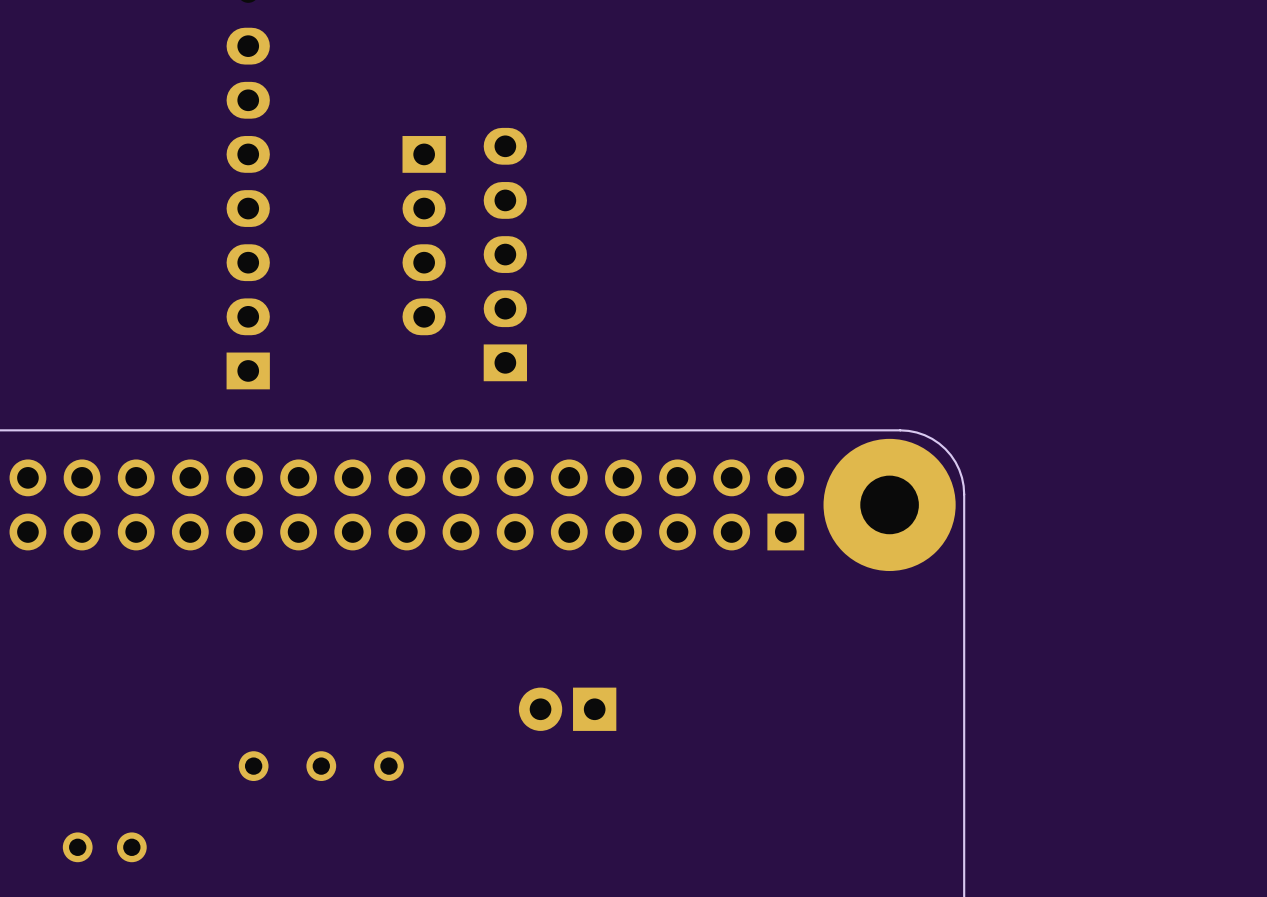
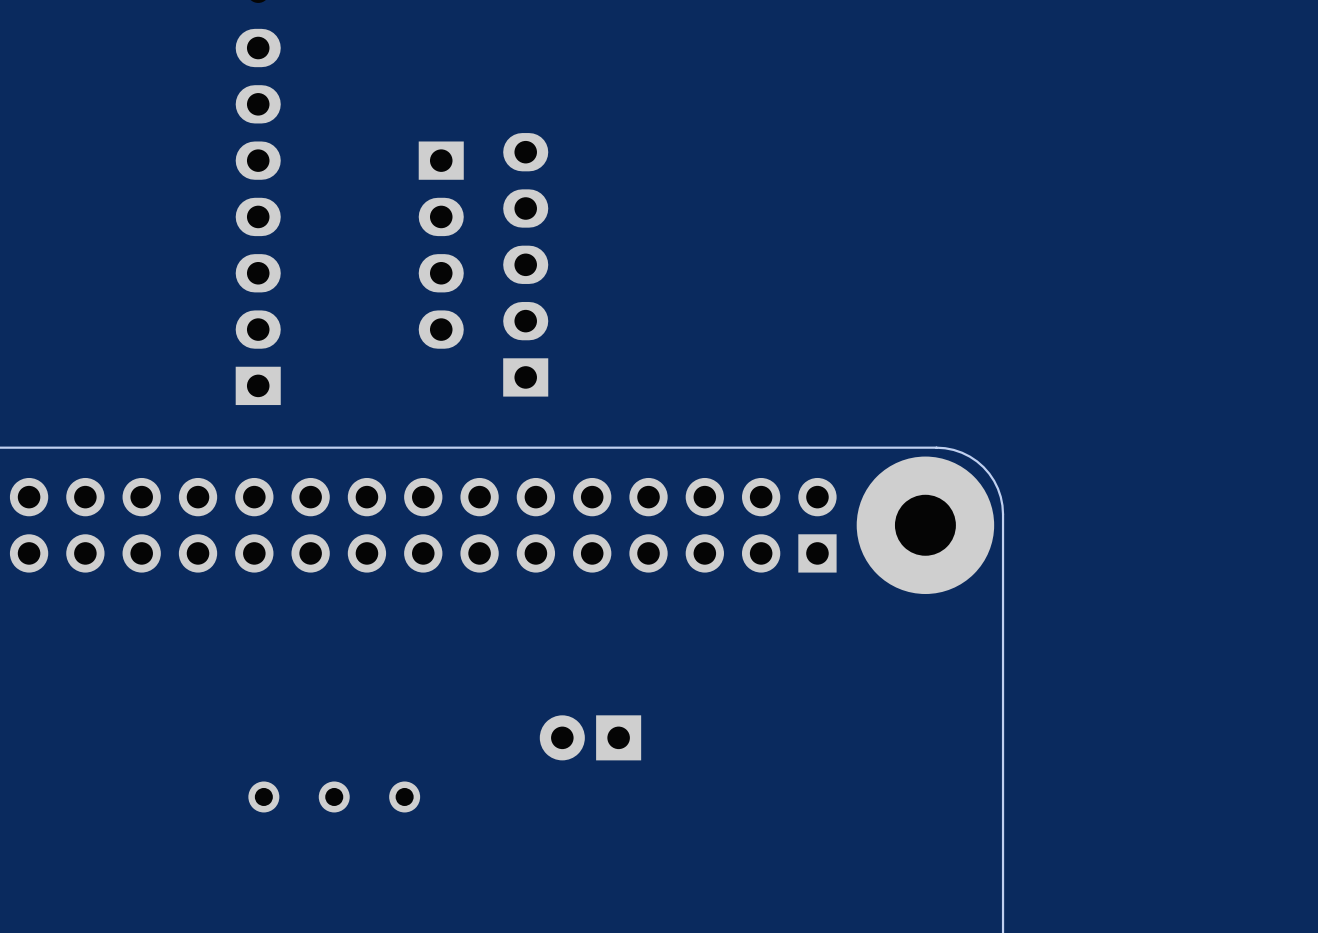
part: (104, 847) -> none

